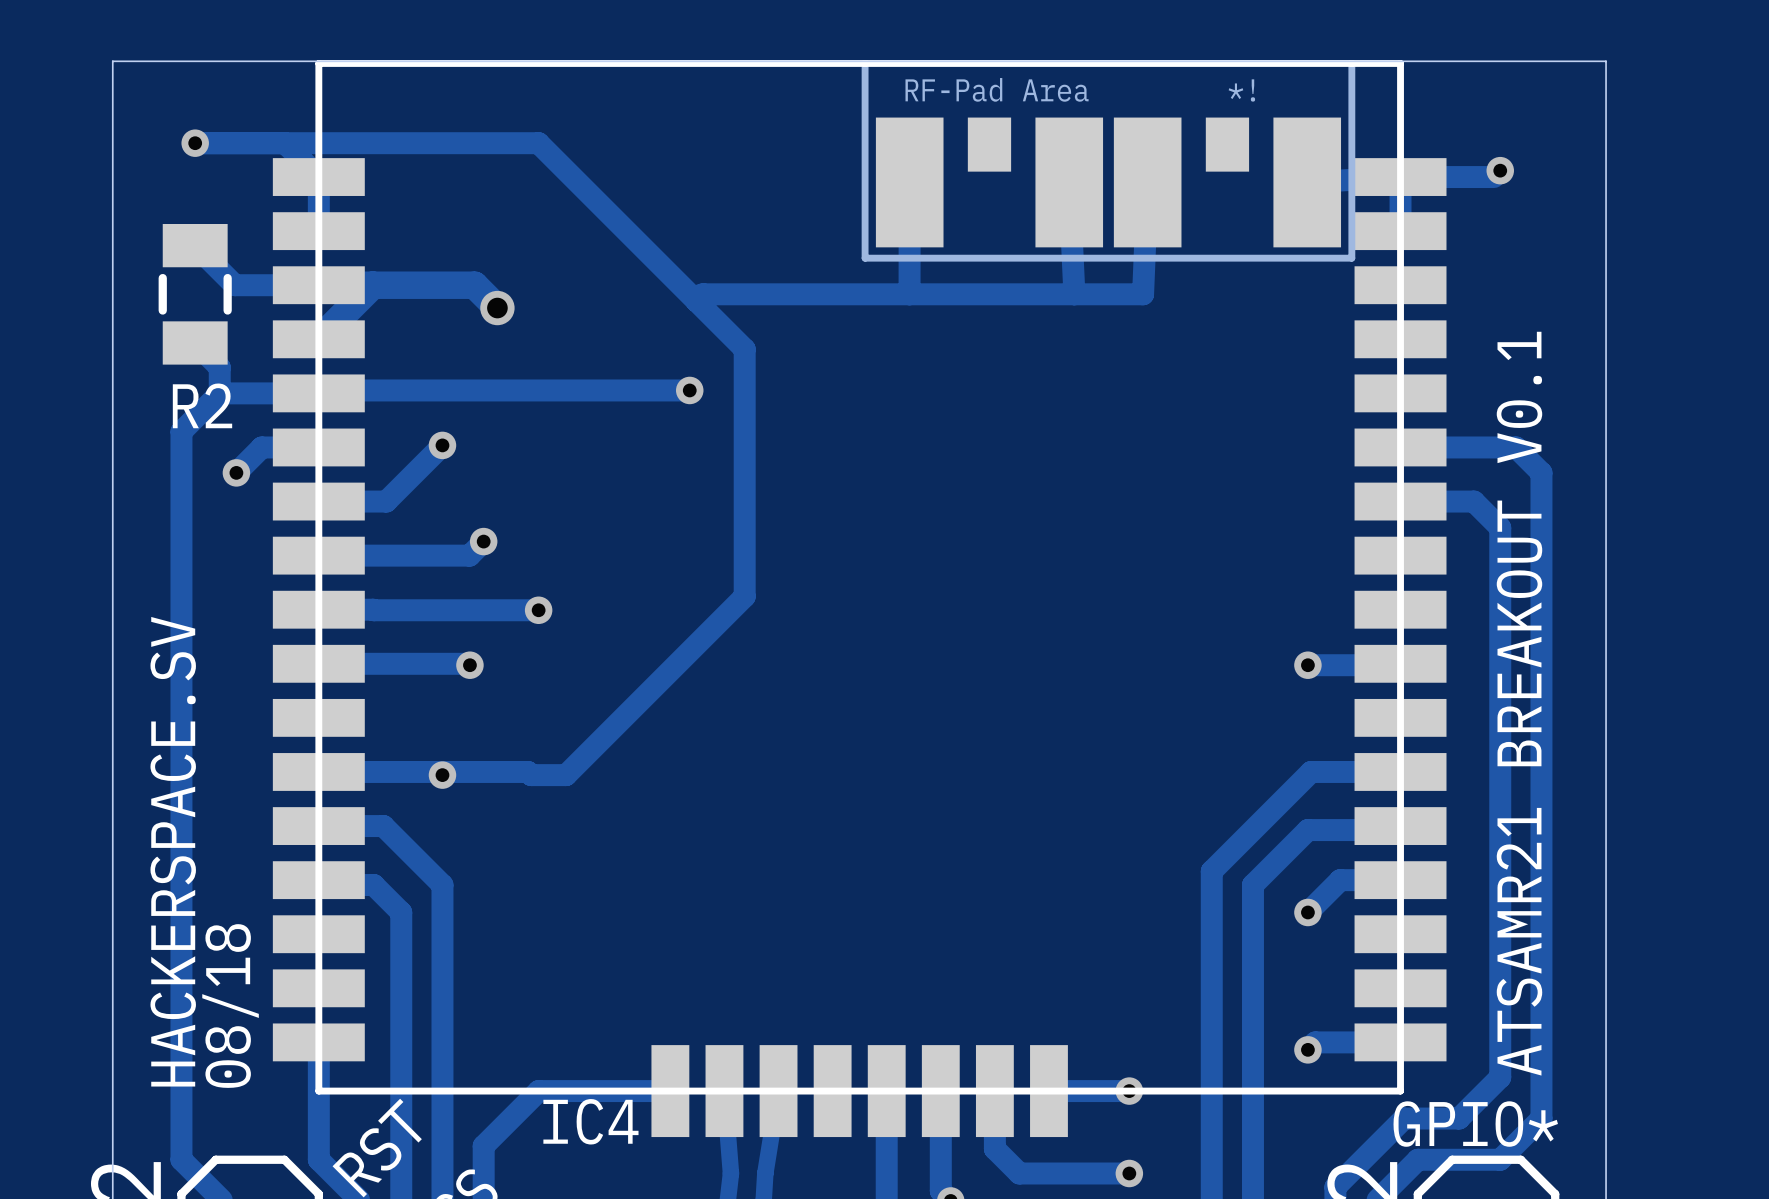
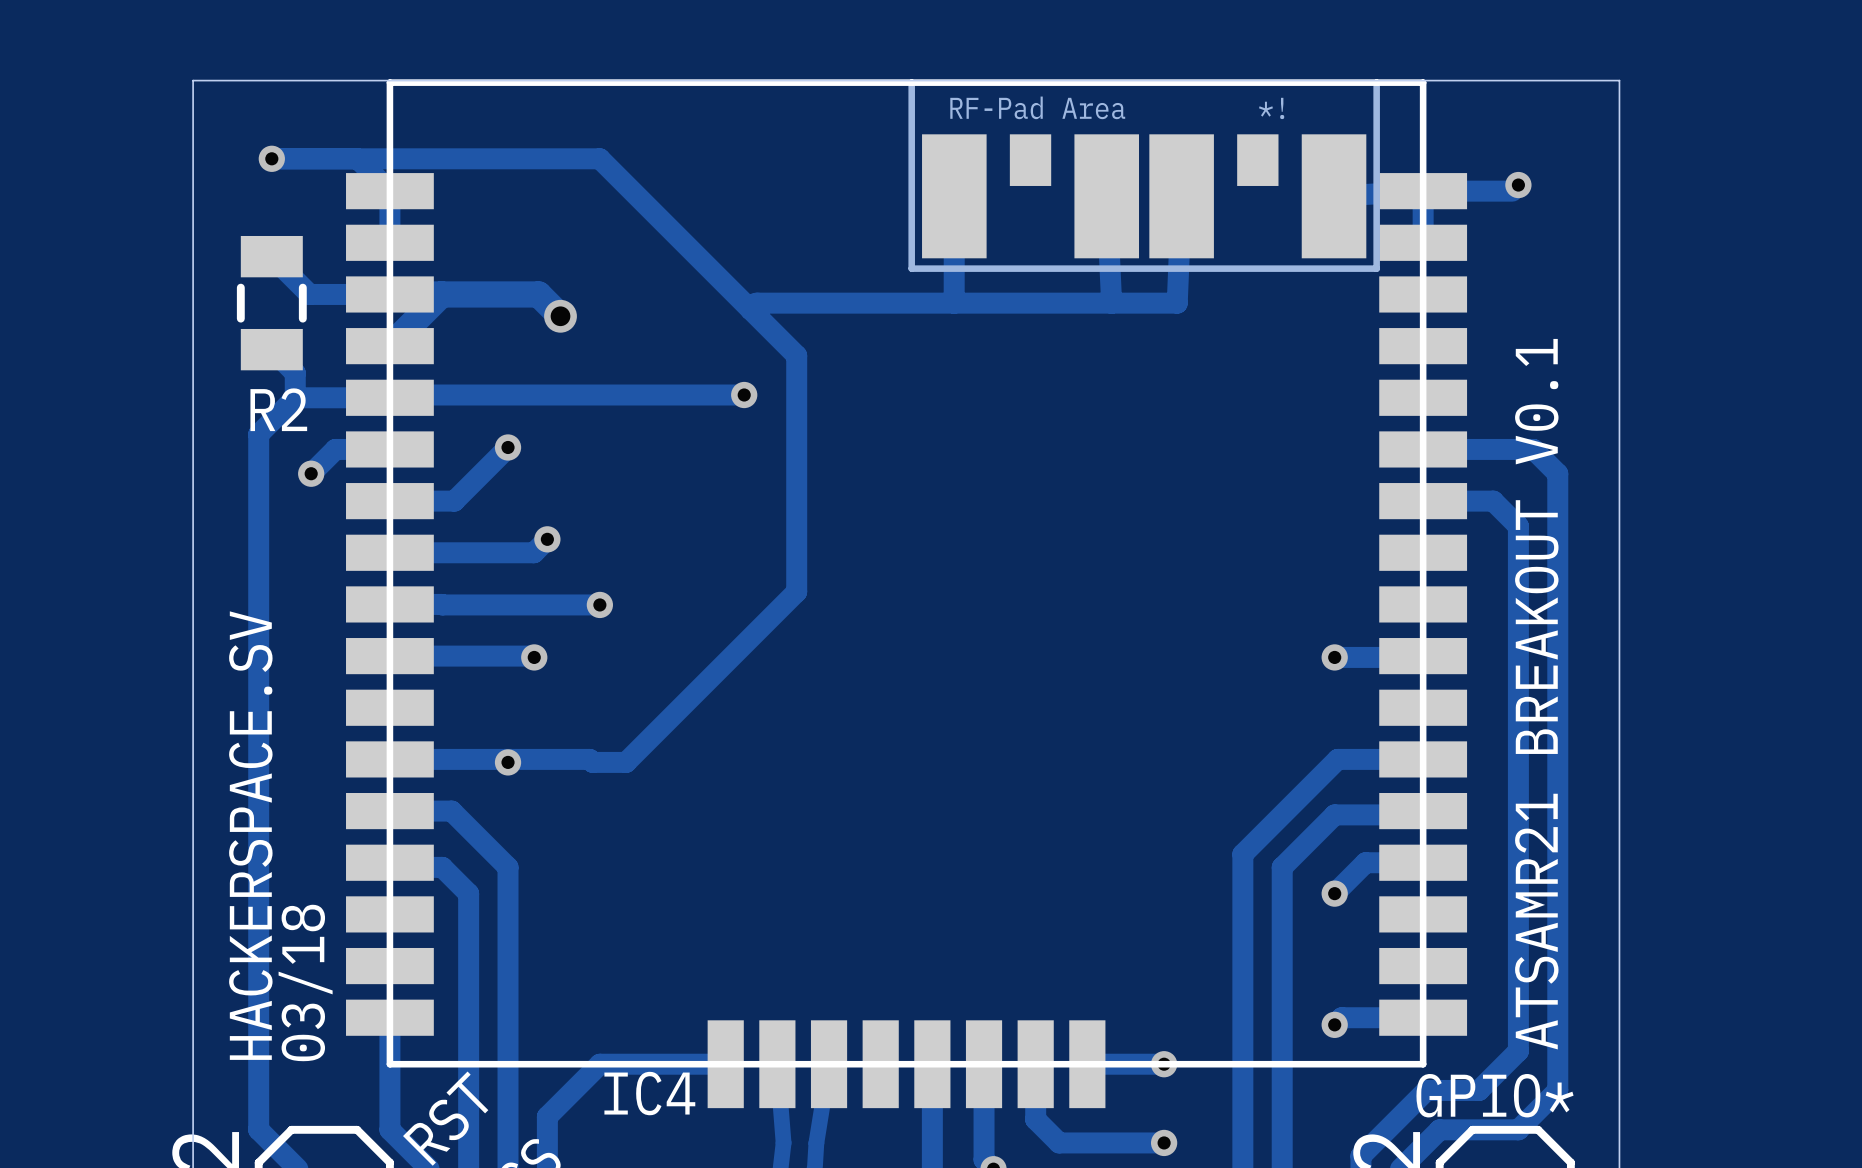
text: 08/18 (230, 1006) -> 03/18 (305, 982)

